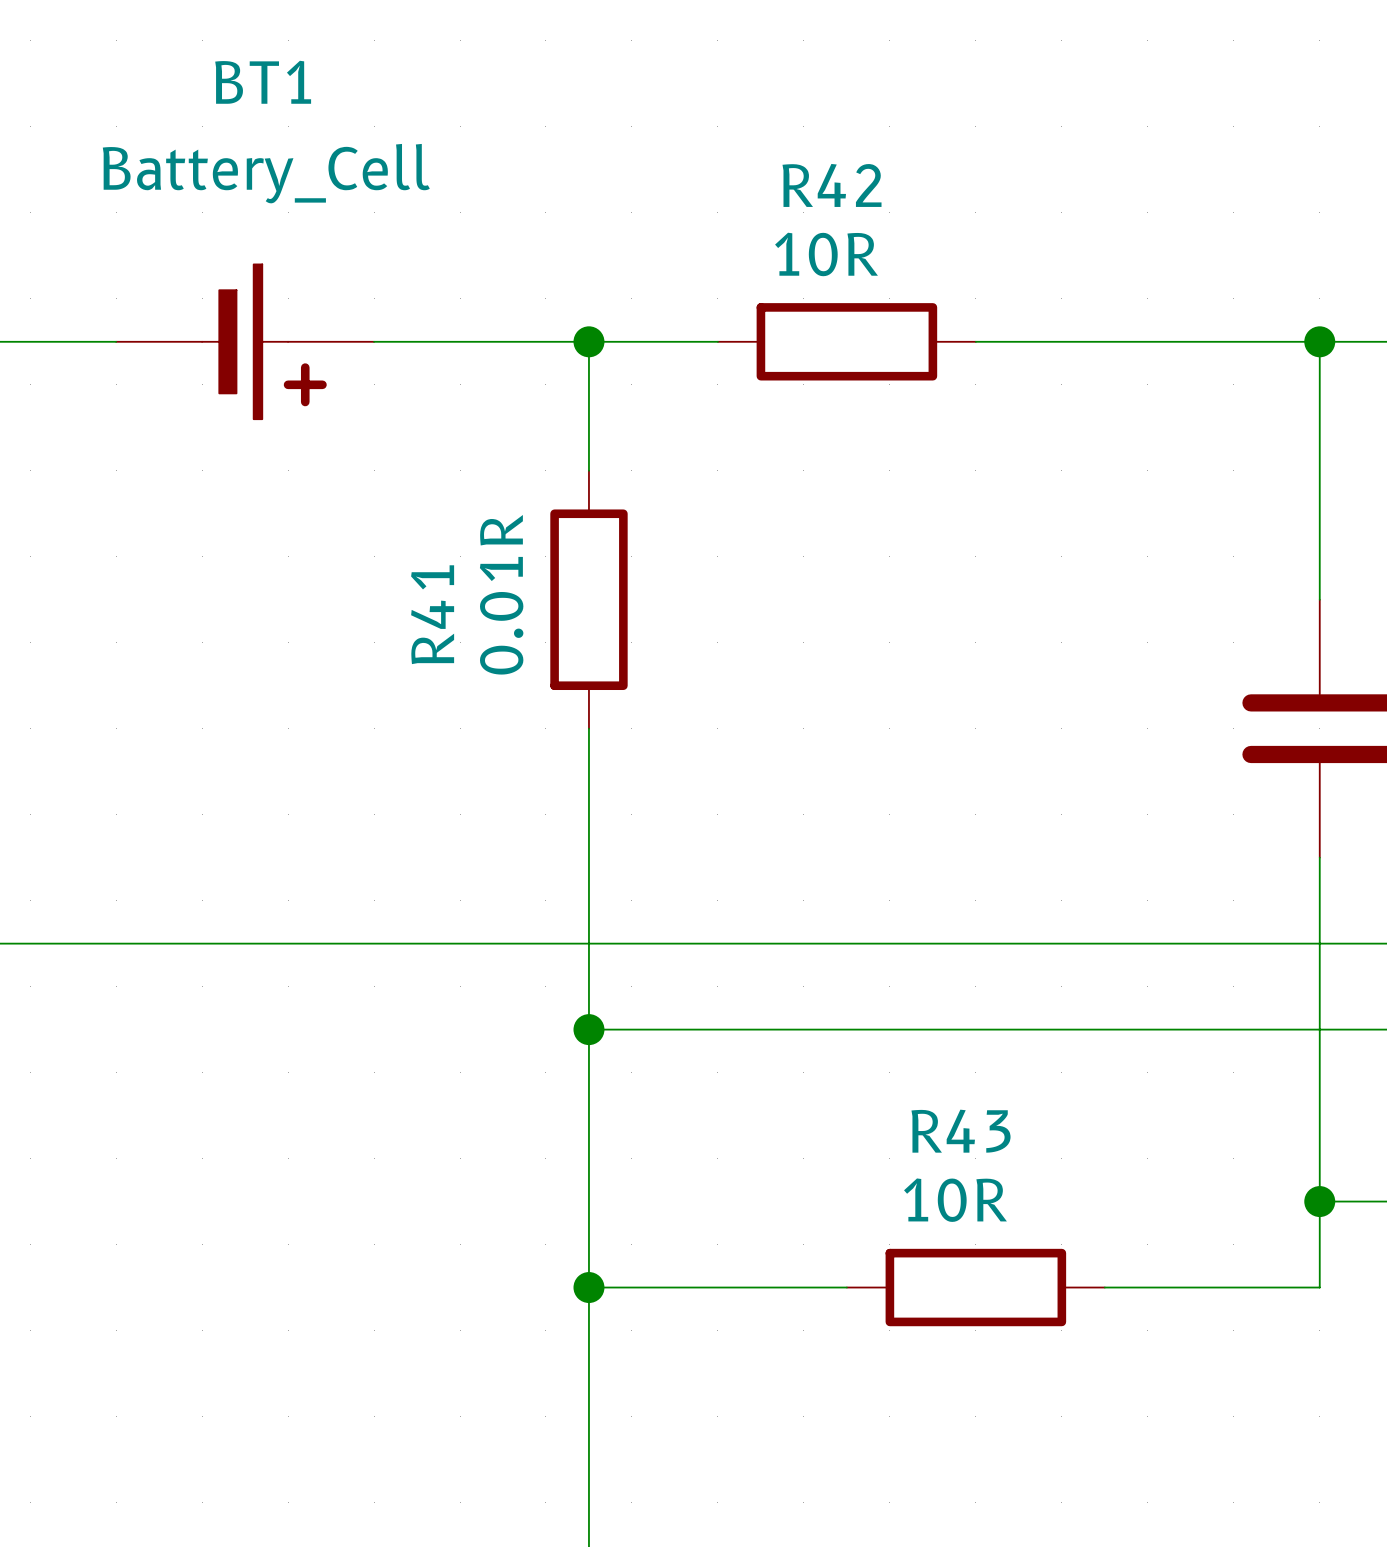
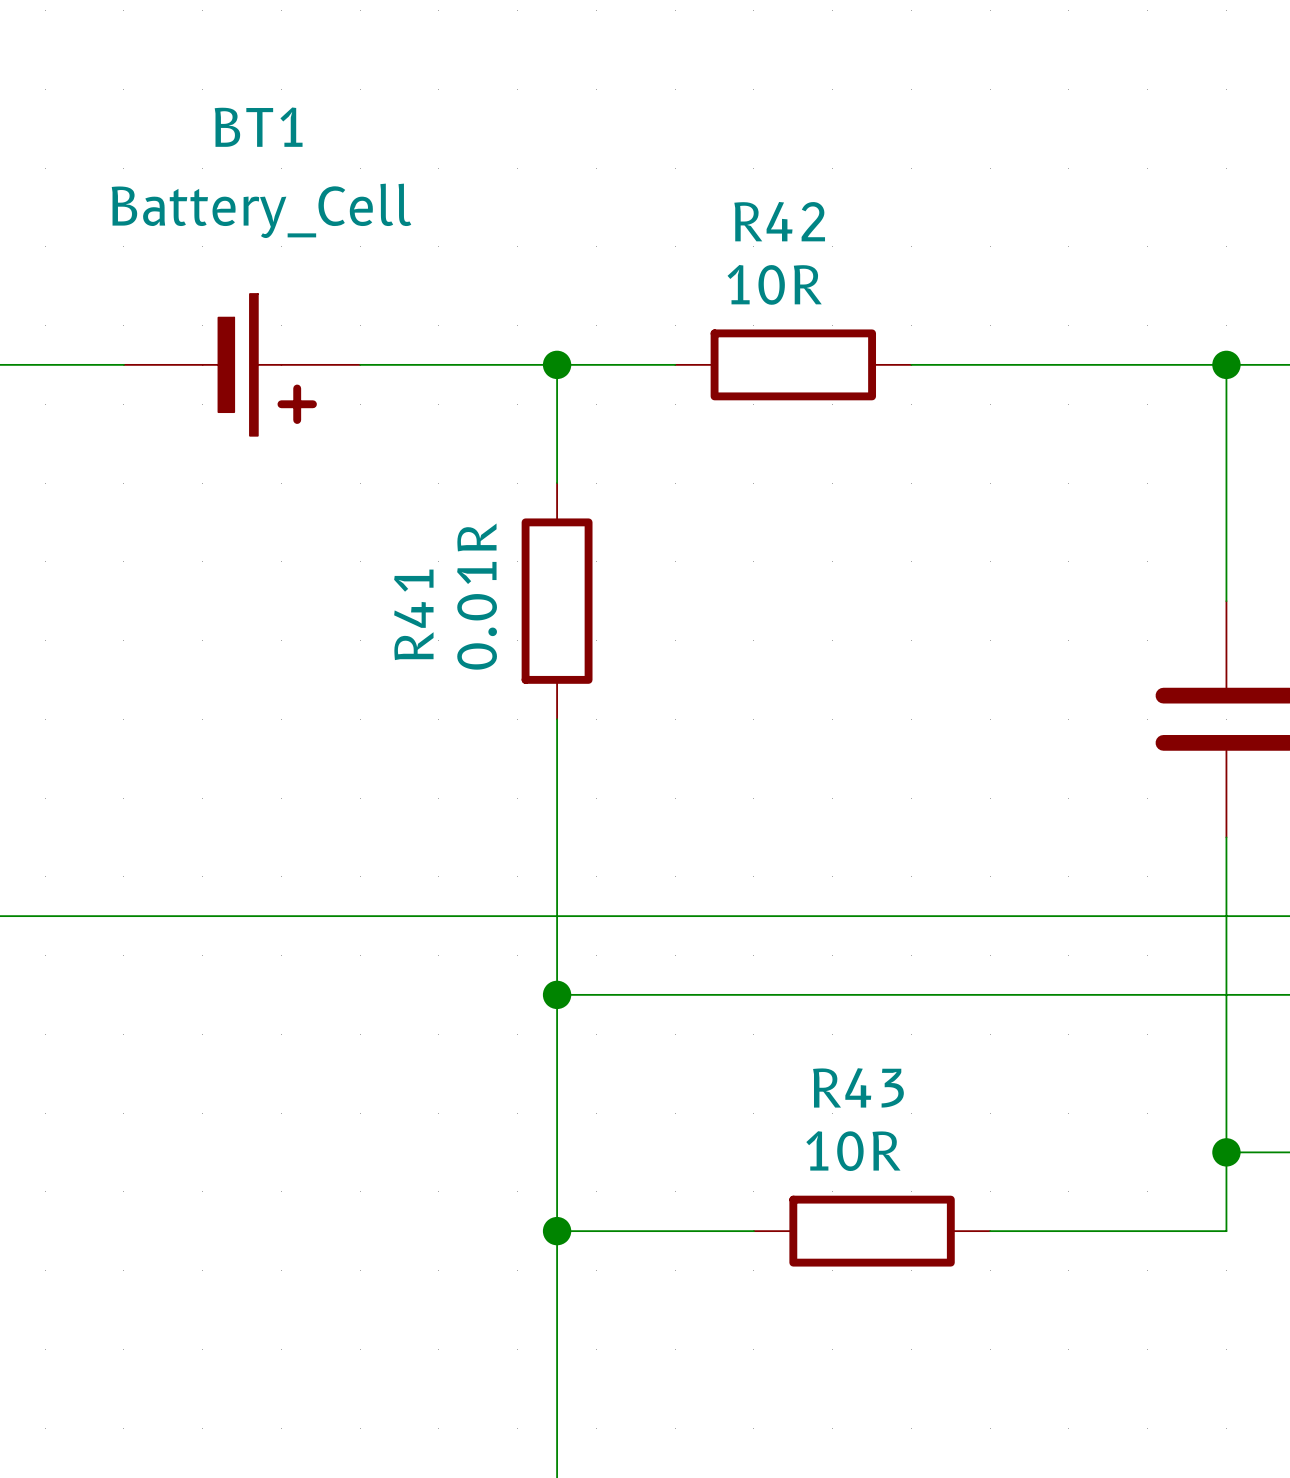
R43 position: (975, 1287) -> (872, 1231)

